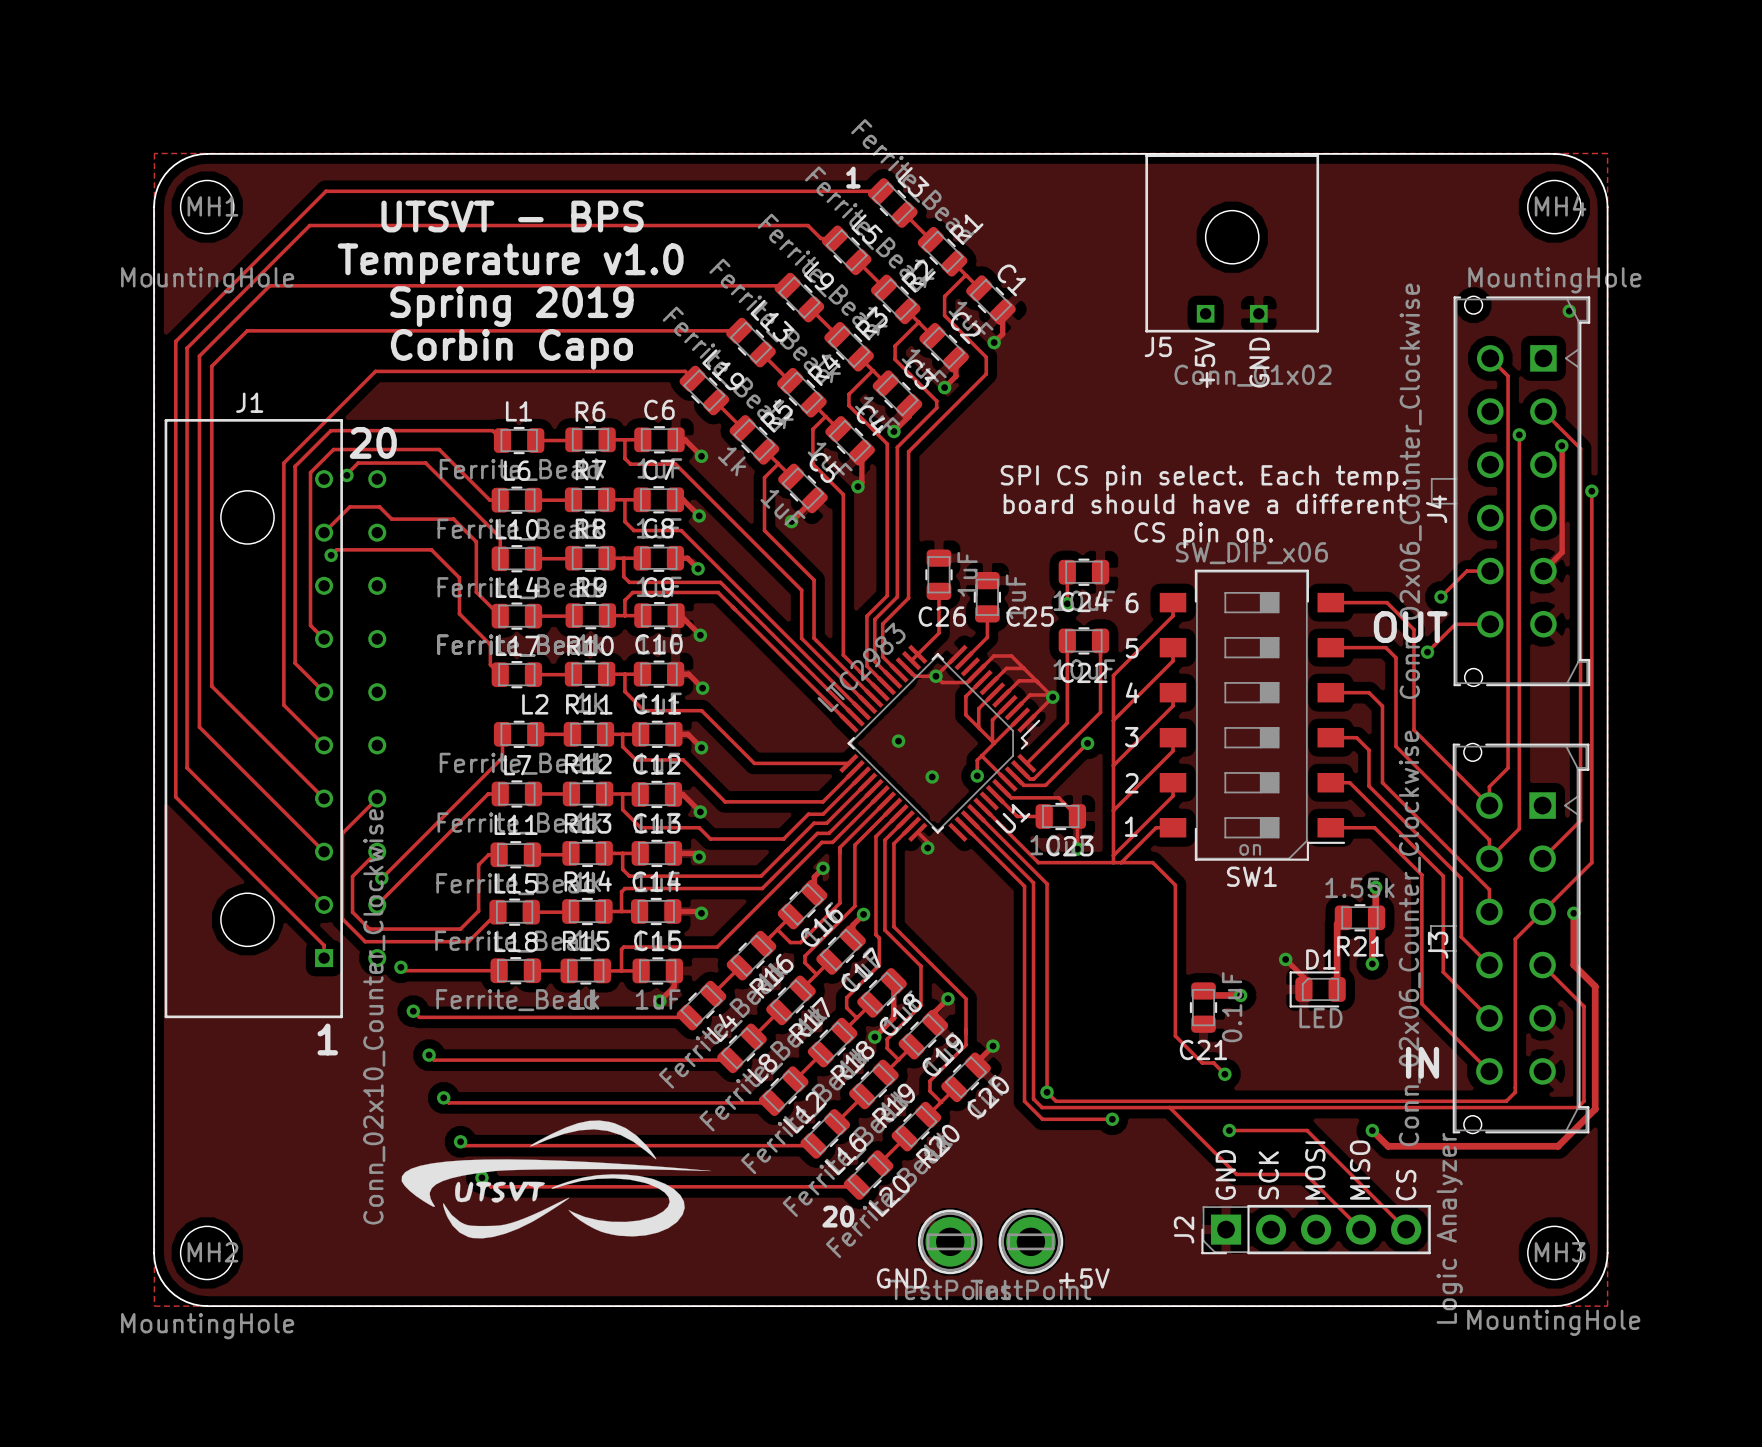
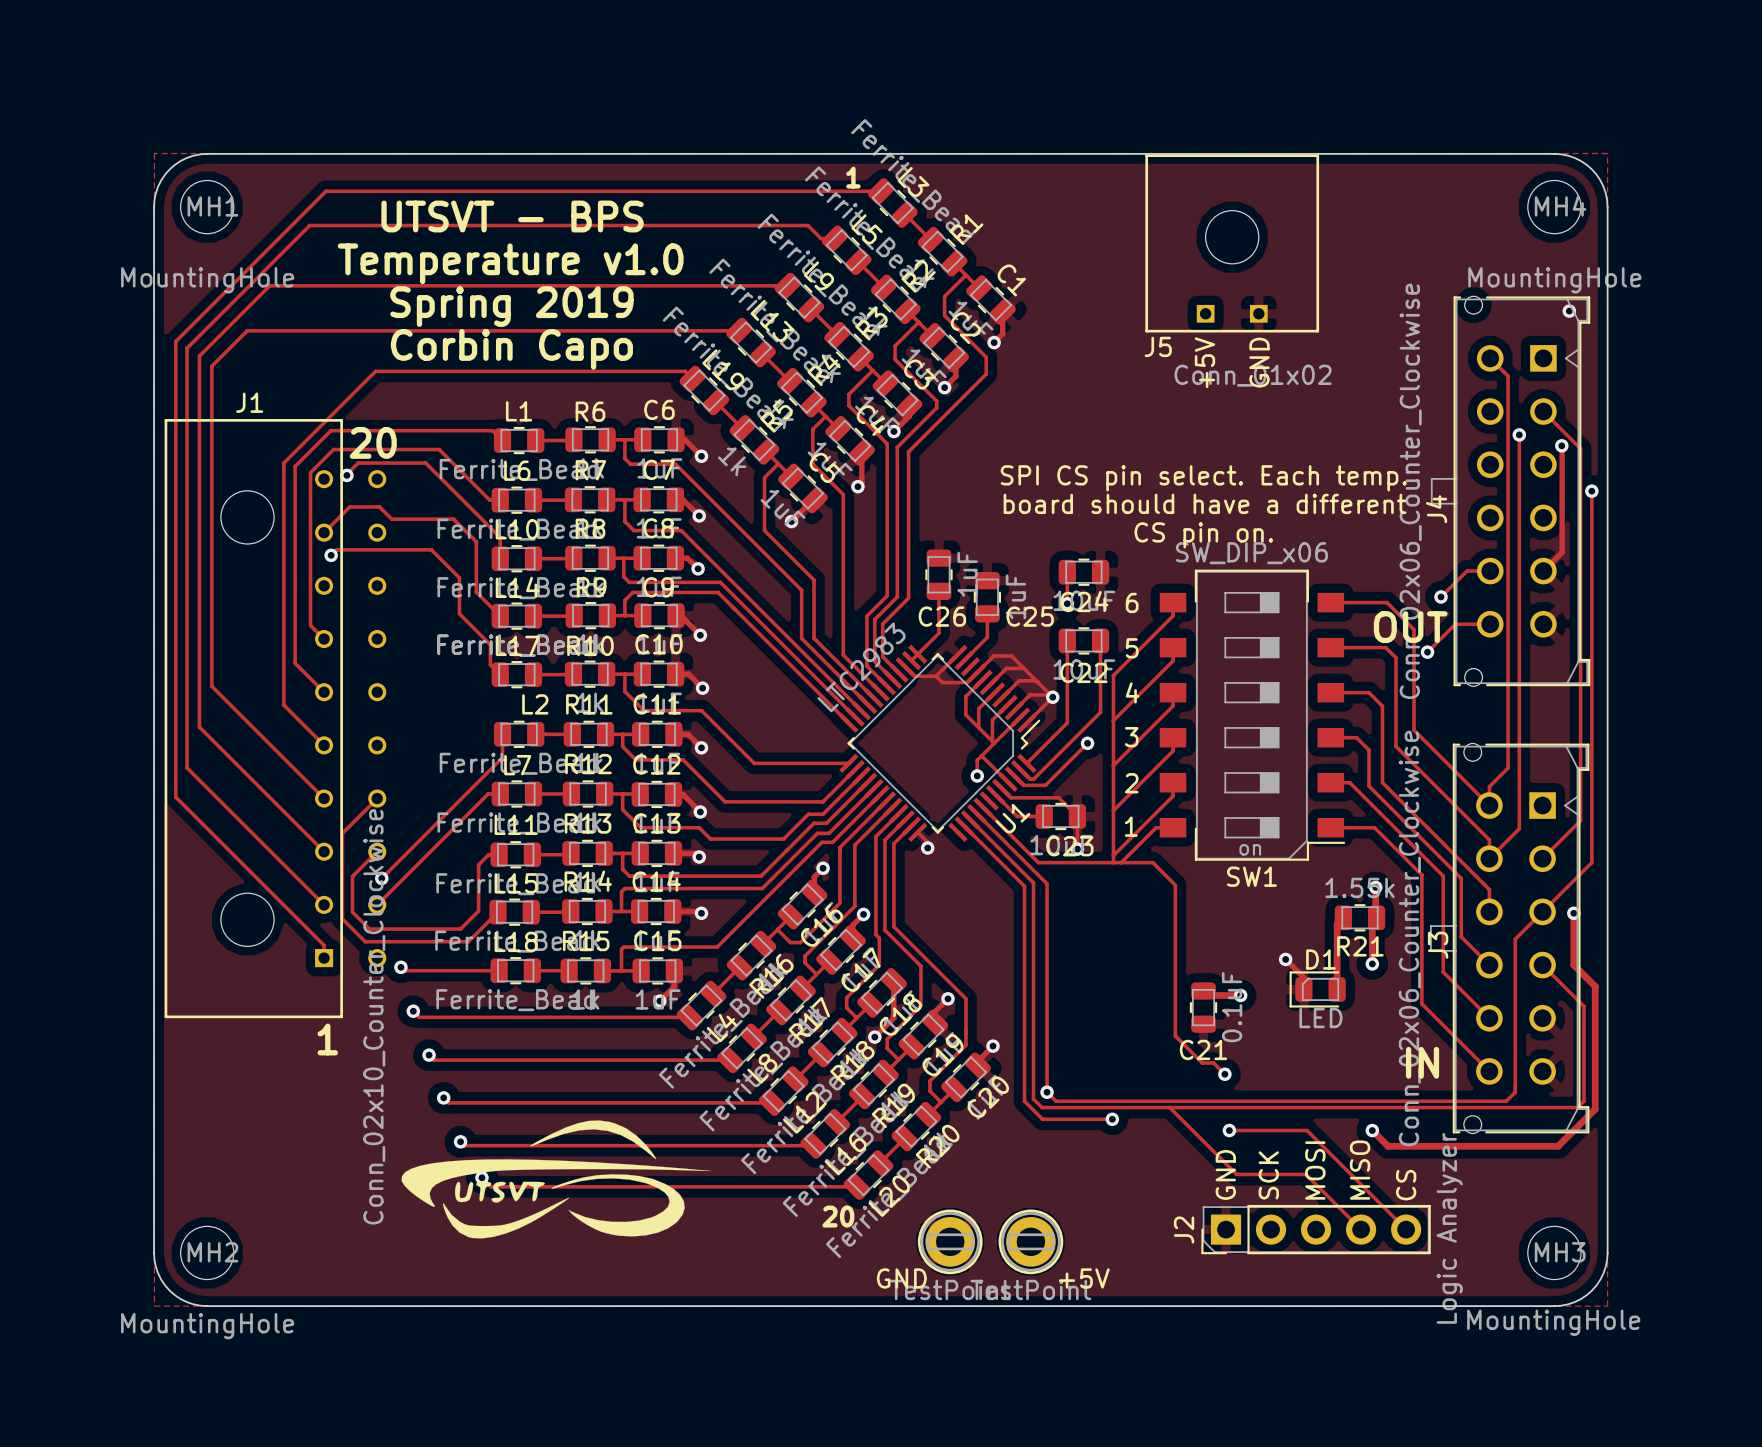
via: (935, 676) -> none
via: (898, 741) -> none
via: (932, 776) -> none

